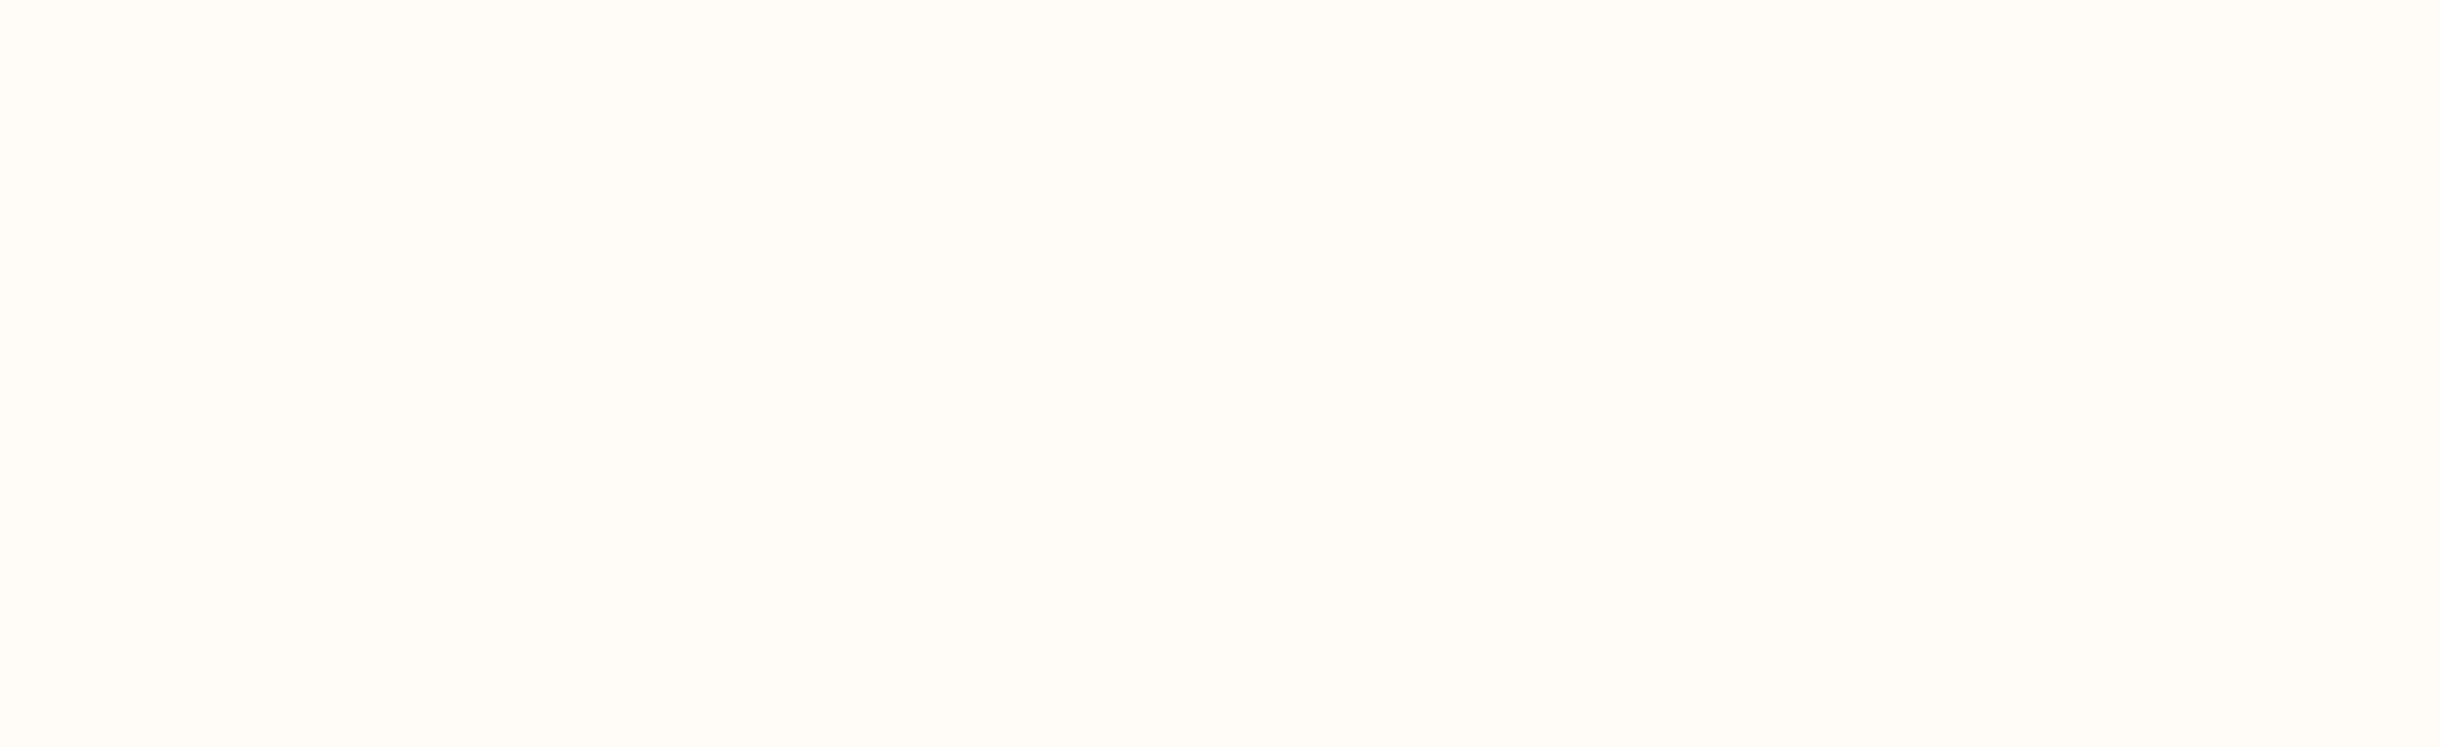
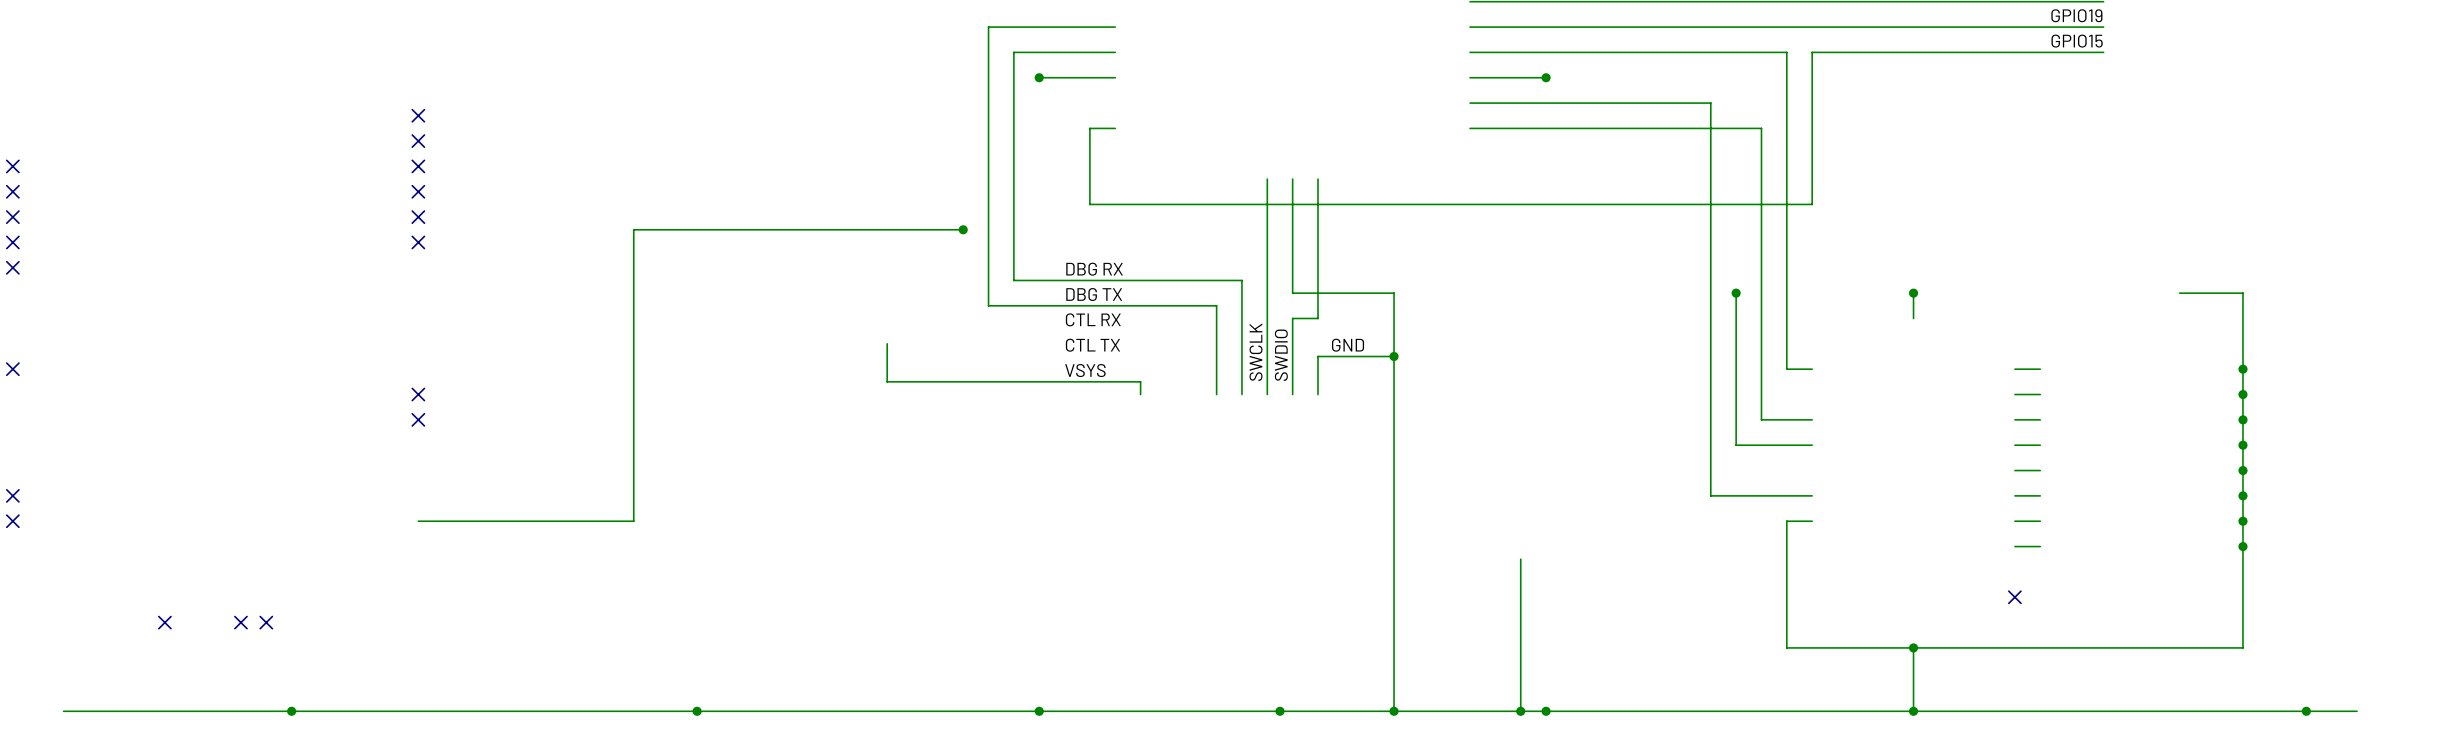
wire: none -> (1470, 1) (2103, 1)
label: none -> GPIO19 (2076, 15)
wire: none -> (1115, 27) (988, 27) (988, 305) (1216, 305) (1216, 394)
wire: none -> (1470, 27) (2103, 27)
label: none -> GPIO15 (2077, 41)
wire: none -> (1115, 52) (1013, 52) (1013, 280) (1241, 280) (1241, 394)
wire: none -> (1470, 52) (1786, 52) (1786, 369) (1812, 369)
wire: none -> (2103, 52) (1812, 52) (1812, 204) (1089, 204) (1089, 128) (1115, 128)
wire: none -> (1039, 77) (1115, 77)
junction: none -> (1039, 77)
wire: none -> (1470, 77) (1546, 77)
junction: none -> (1546, 77)
wire: none -> (1470, 103) (1710, 103) (1710, 495) (1812, 495)
no-connect mark: none -> (418, 115)
wire: none -> (1470, 128) (1761, 128) (1761, 419) (1812, 419)
no-connect mark: none -> (418, 141)
no-connect mark: none -> (12, 166)
no-connect mark: none -> (418, 166)
wire: none -> (1267, 179) (1267, 394)
wire: none -> (1292, 179) (1292, 293) (1394, 293) (1394, 711)
wire: none -> (1317, 179) (1317, 318) (1292, 318) (1292, 394)
no-connect mark: none -> (12, 191)
no-connect mark: none -> (418, 191)
no-connect mark: none -> (12, 217)
no-connect mark: none -> (418, 217)
wire: none -> (963, 229) (633, 229) (633, 521) (418, 521)
junction: none -> (963, 229)
no-connect mark: none -> (12, 242)
no-connect mark: none -> (418, 242)
no-connect mark: none -> (12, 267)
label: none -> DBG RX (1094, 269)
wire: none -> (1736, 293) (1736, 445) (1812, 445)
junction: none -> (1736, 293)
wire: none -> (1913, 293) (1913, 318)
junction: none -> (1913, 293)
wire: none -> (2179, 293) (2242, 293) (2242, 647) (1786, 647) (1786, 521) (1812, 521)
label: none -> DBG TX (1094, 294)
label: none -> CTL RX (1093, 319)
wire: none -> (887, 343) (887, 381) (1140, 381) (1140, 394)
label: none -> CTL TX (1092, 345)
label: none -> GND (1348, 345)
label: none -> SWCLK (1256, 352)
label: none -> SWDIO (1281, 355)
wire: none -> (1394, 356) (1317, 356) (1317, 394)
junction: none -> (1394, 356)
no-connect mark: none -> (12, 369)
wire: none -> (2014, 369) (2040, 369)
junction: none -> (2242, 369)
label: none -> VSYS (1085, 370)
no-connect mark: none -> (418, 394)
wire: none -> (2014, 394) (2040, 394)
junction: none -> (2242, 394)
no-connect mark: none -> (418, 419)
wire: none -> (2014, 419) (2040, 419)
junction: none -> (2242, 419)
wire: none -> (2014, 445) (2040, 445)
junction: none -> (2242, 445)
wire: none -> (2014, 470) (2040, 470)
junction: none -> (2242, 470)
no-connect mark: none -> (12, 495)
wire: none -> (2014, 495) (2040, 495)
junction: none -> (2242, 495)
no-connect mark: none -> (12, 521)
wire: none -> (2014, 521) (2040, 521)
junction: none -> (2242, 521)
wire: none -> (2014, 546) (2040, 546)
junction: none -> (2242, 546)
wire: none -> (1520, 559) (1520, 711)
no-connect mark: none -> (2014, 597)
no-connect mark: none -> (164, 622)
no-connect mark: none -> (240, 622)
no-connect mark: none -> (266, 622)
wire: none -> (1913, 647) (1913, 711)
junction: none -> (1913, 647)
wire: none -> (63, 711) (2357, 711)
junction: none -> (291, 711)
junction: none -> (697, 711)
junction: none -> (1039, 711)
junction: none -> (1279, 711)
junction: none -> (1394, 711)
junction: none -> (1520, 711)
junction: none -> (1546, 711)
junction: none -> (1913, 711)
junction: none -> (2306, 711)

